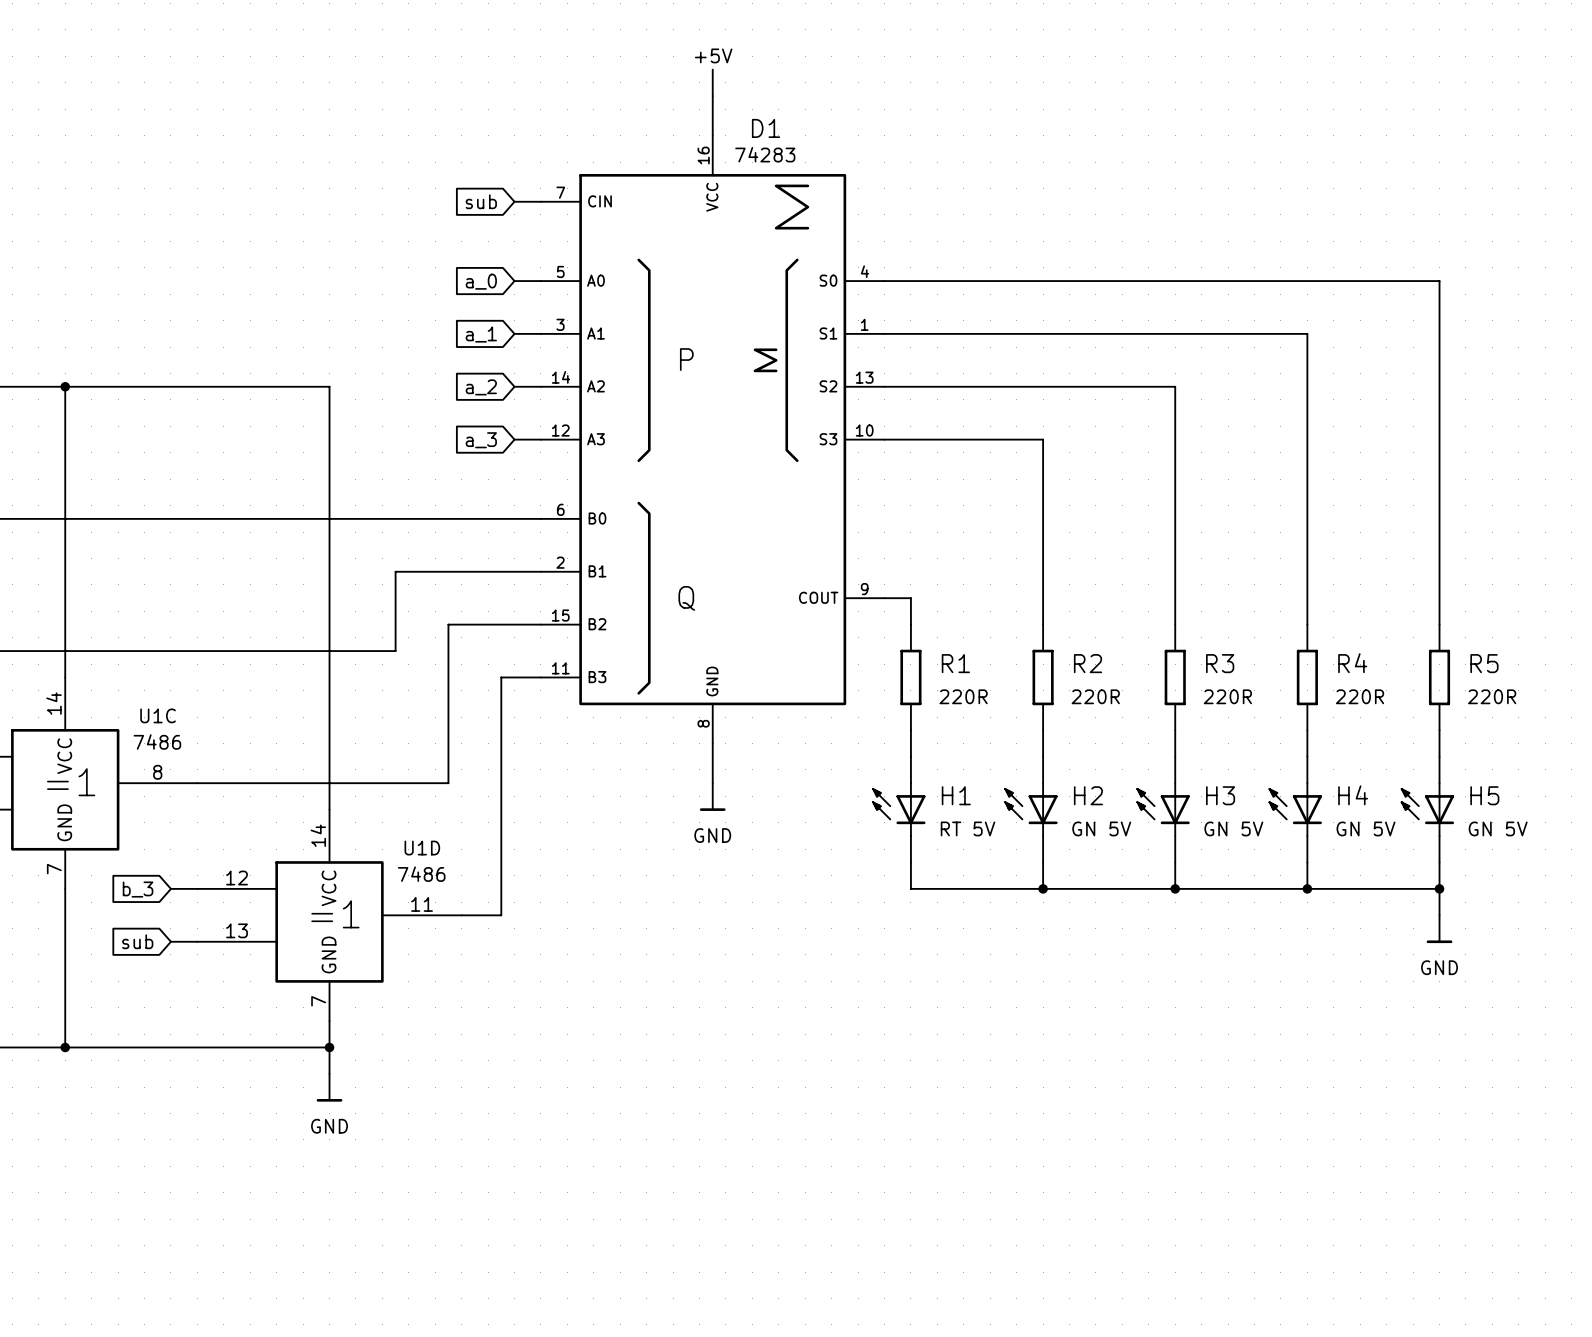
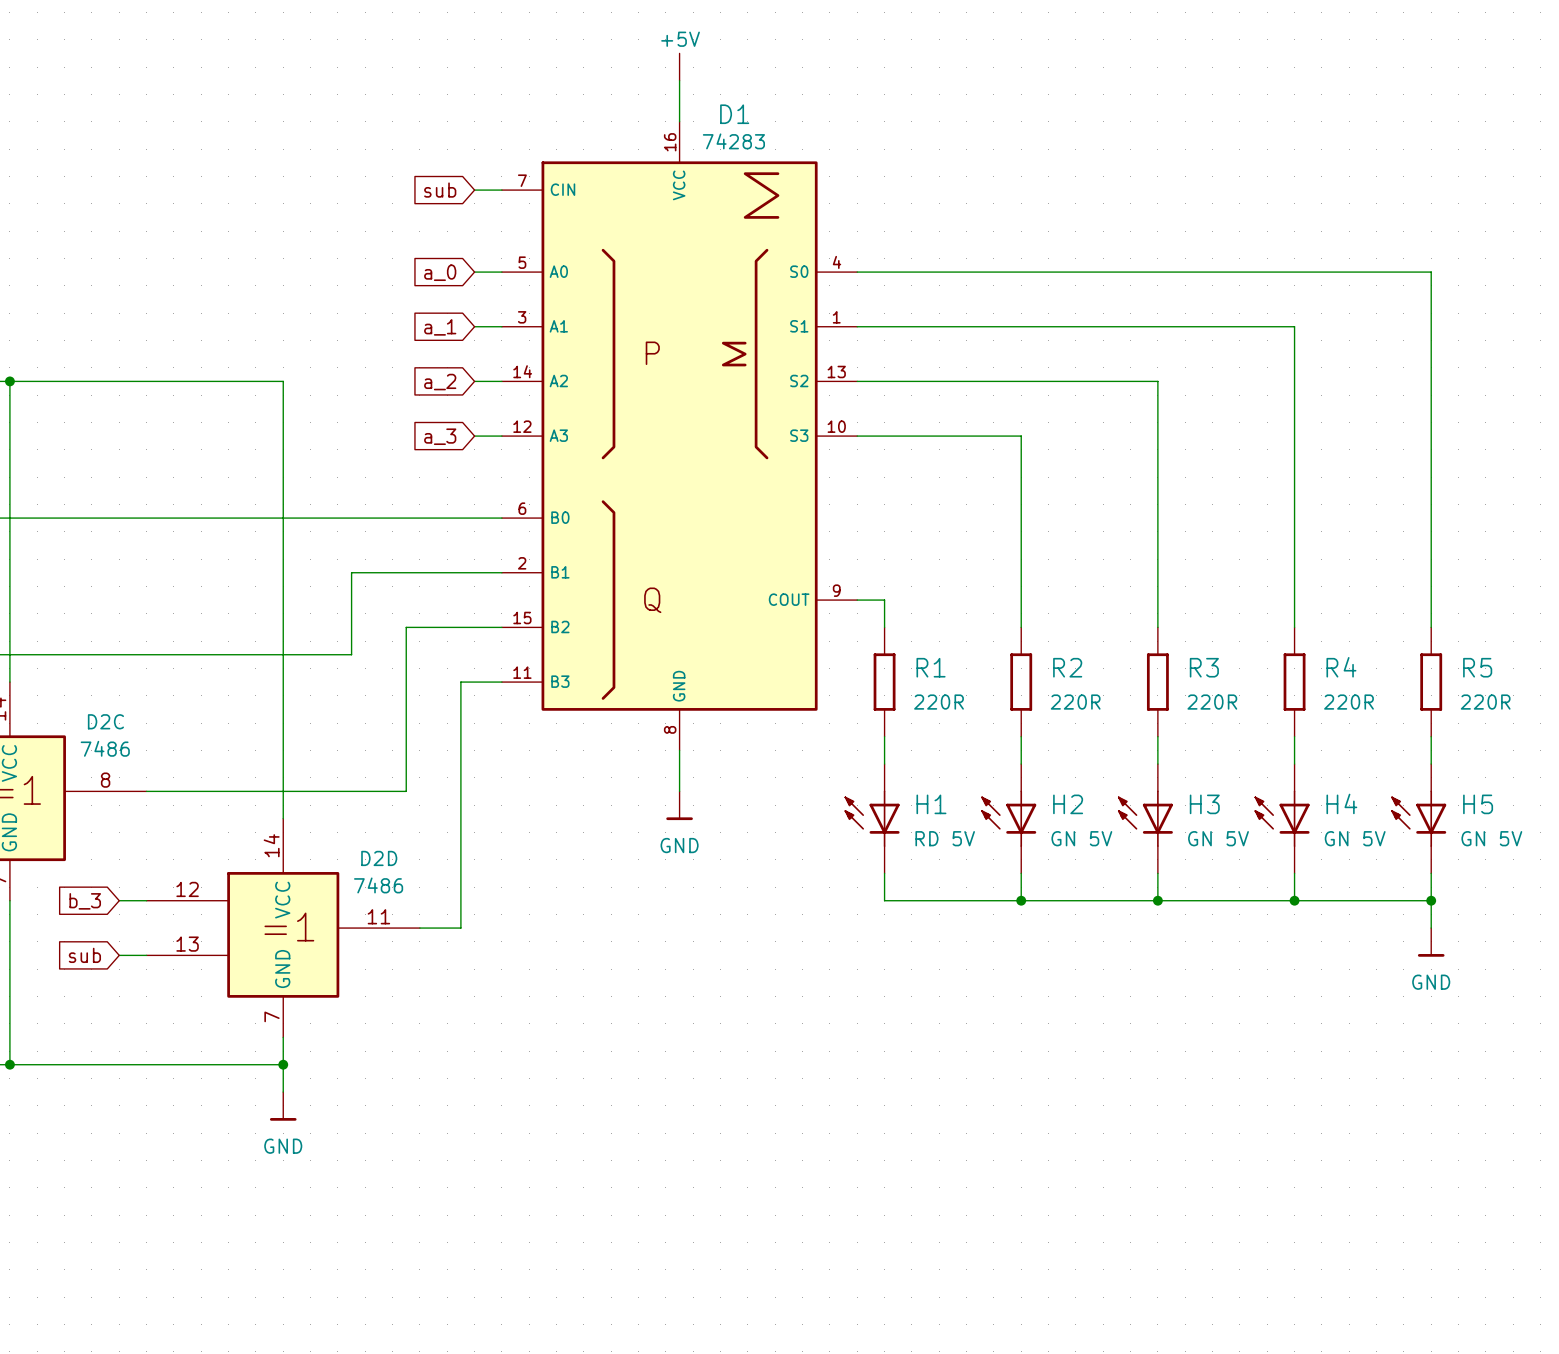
U1C name: U1C (158, 715) -> D2C (105, 721)
H1 value: RT 5V (967, 828) -> RD 5V (945, 838)
U1D name: U1D (422, 848) -> D2D (379, 858)

